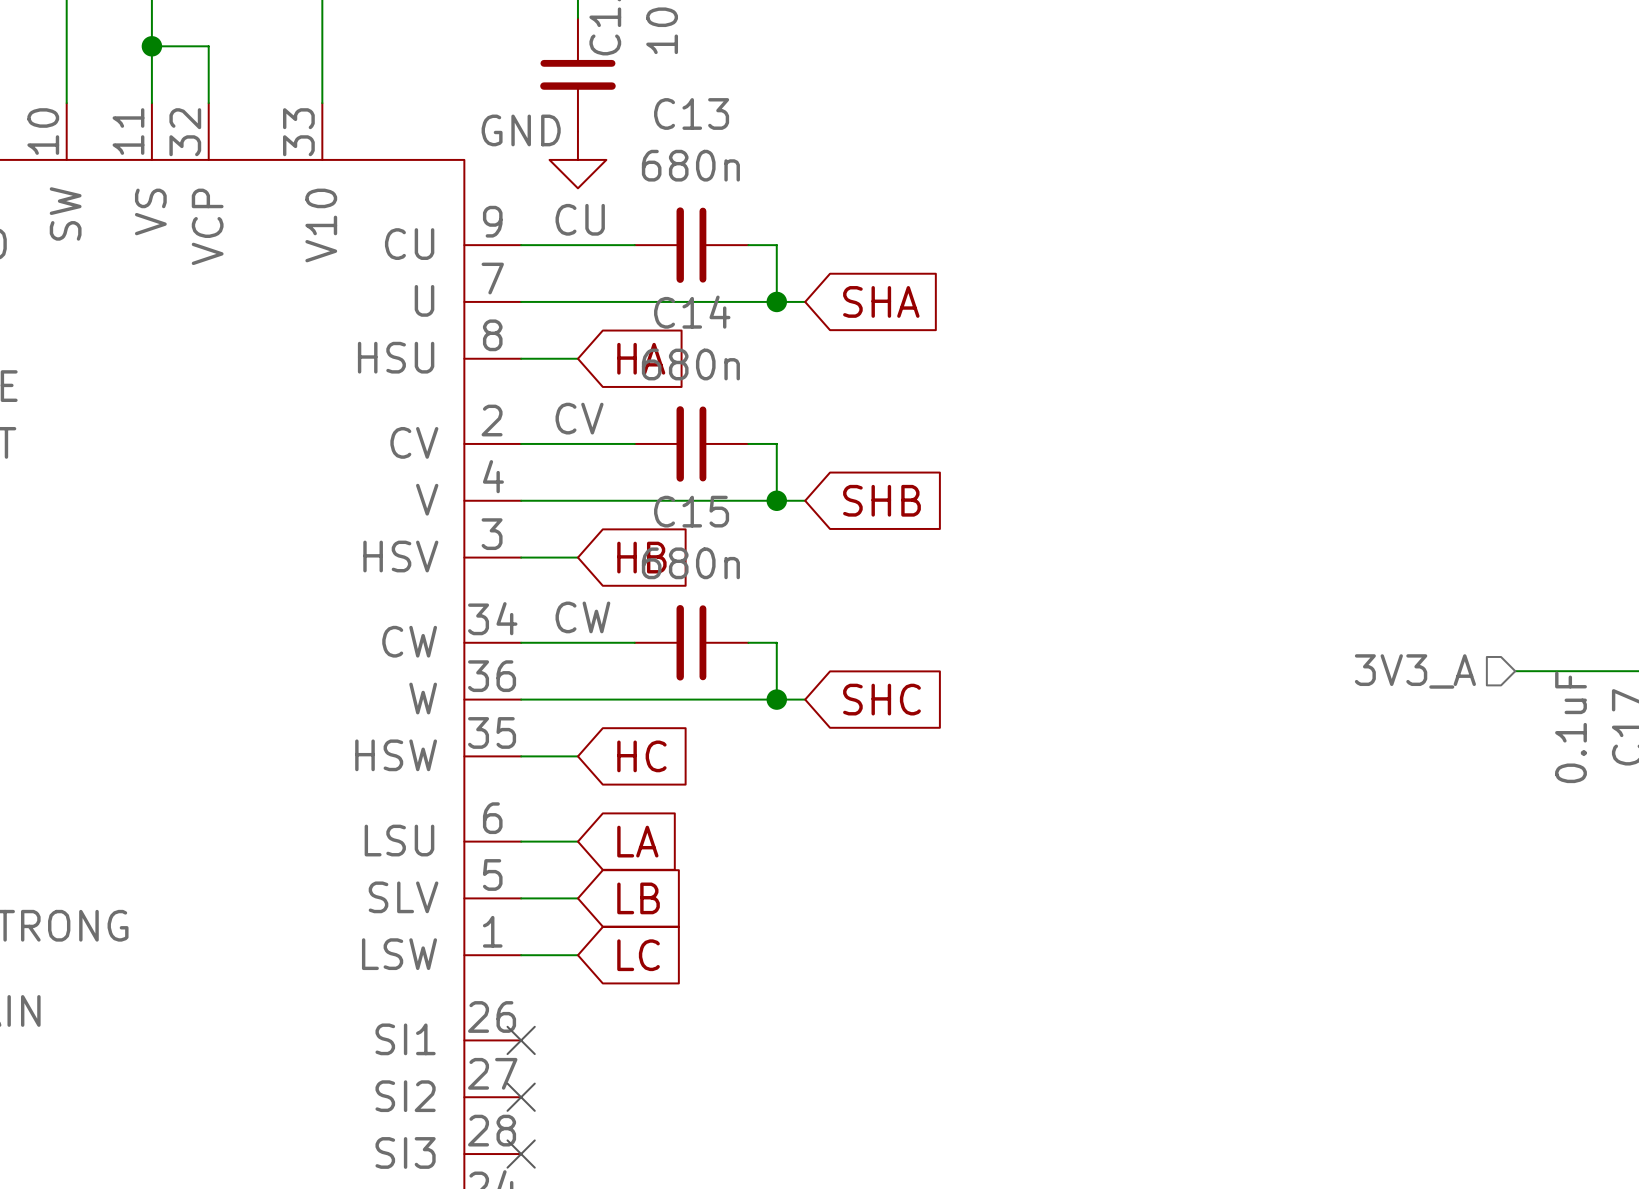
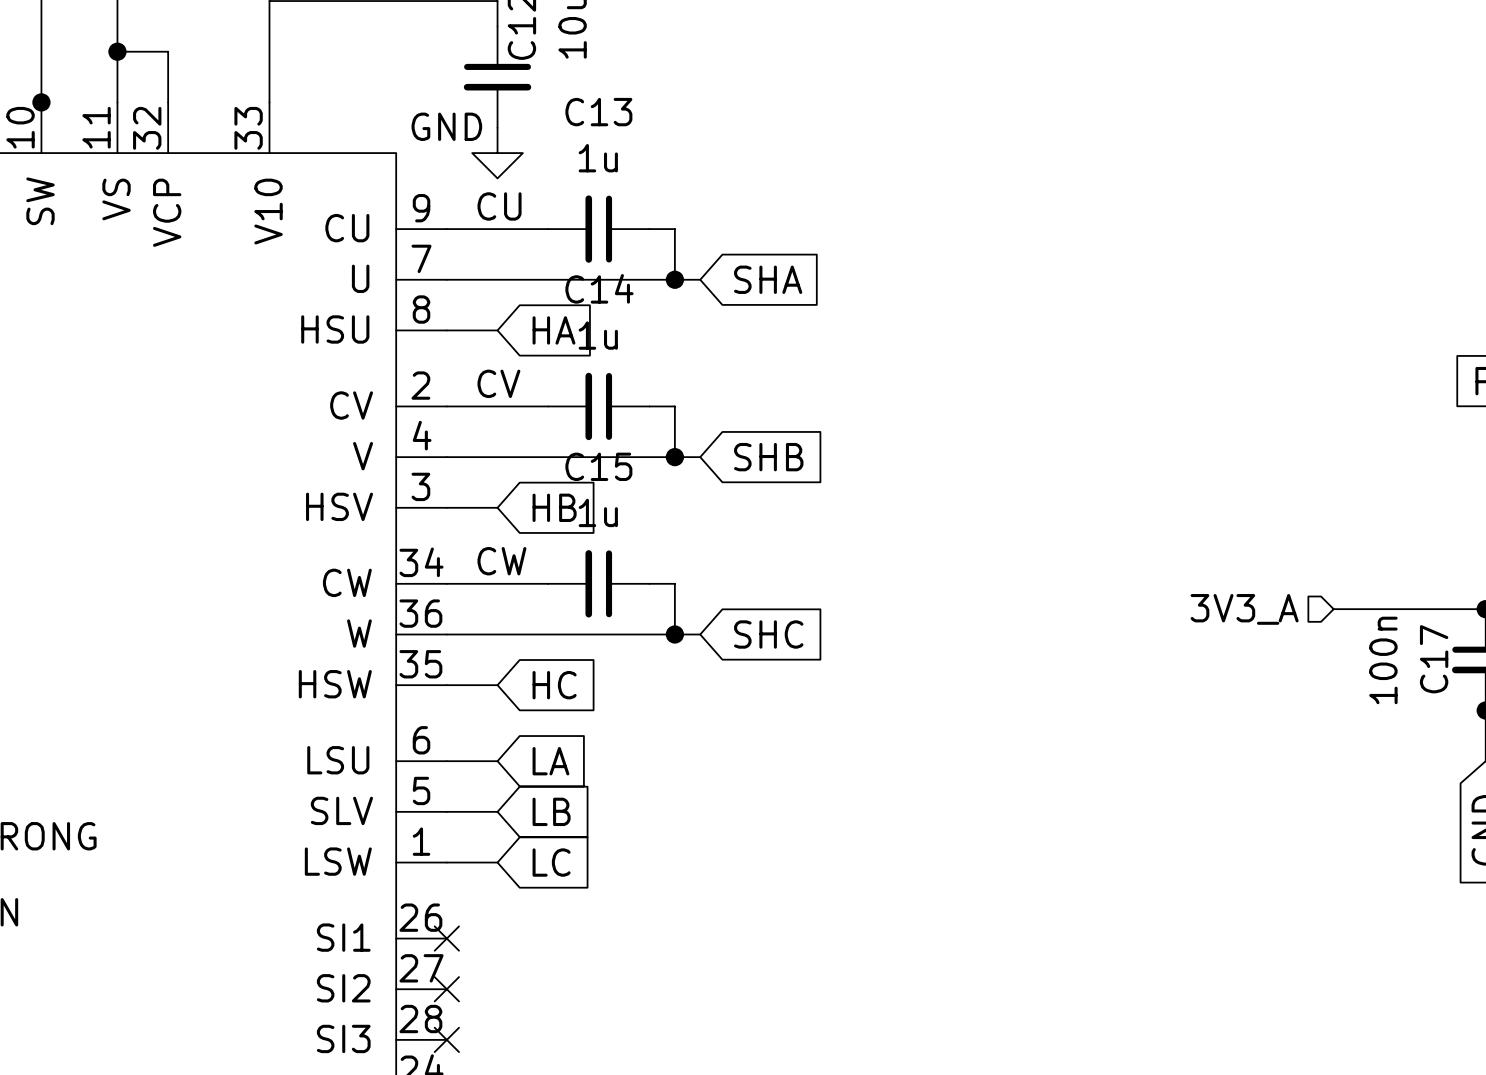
junction: none -> (41, 102)
C13 value: 680n (690, 165) -> 1u (598, 158)
C14 value: 680n (690, 364) -> 1u (598, 335)
C15 value: 680n (690, 563) -> 1u (598, 512)
C17 value: 0.1uF (1571, 727) -> 100n (1383, 660)

